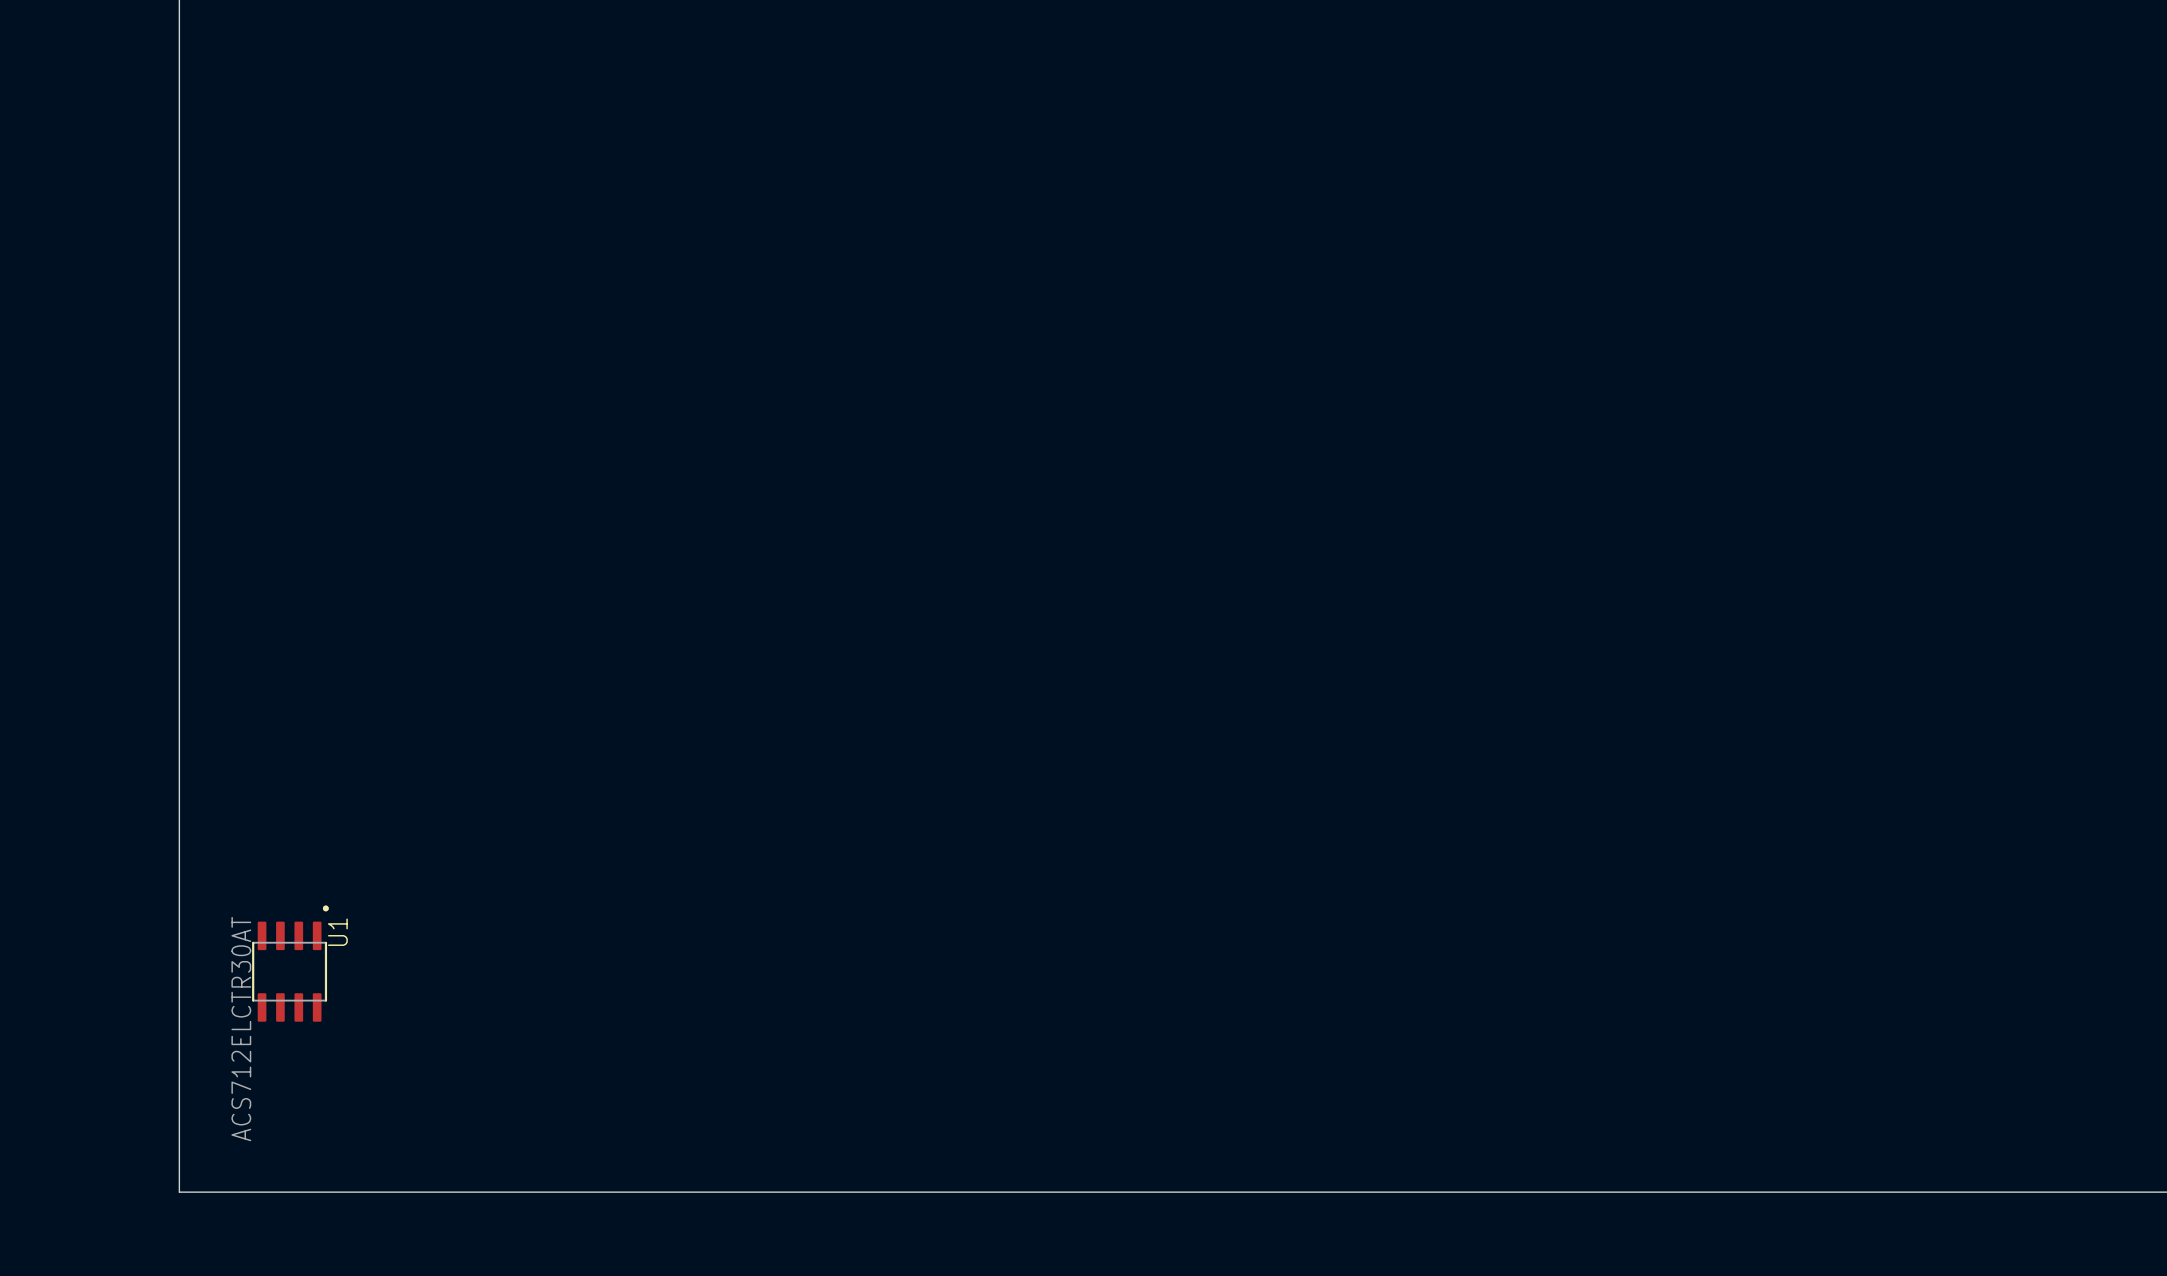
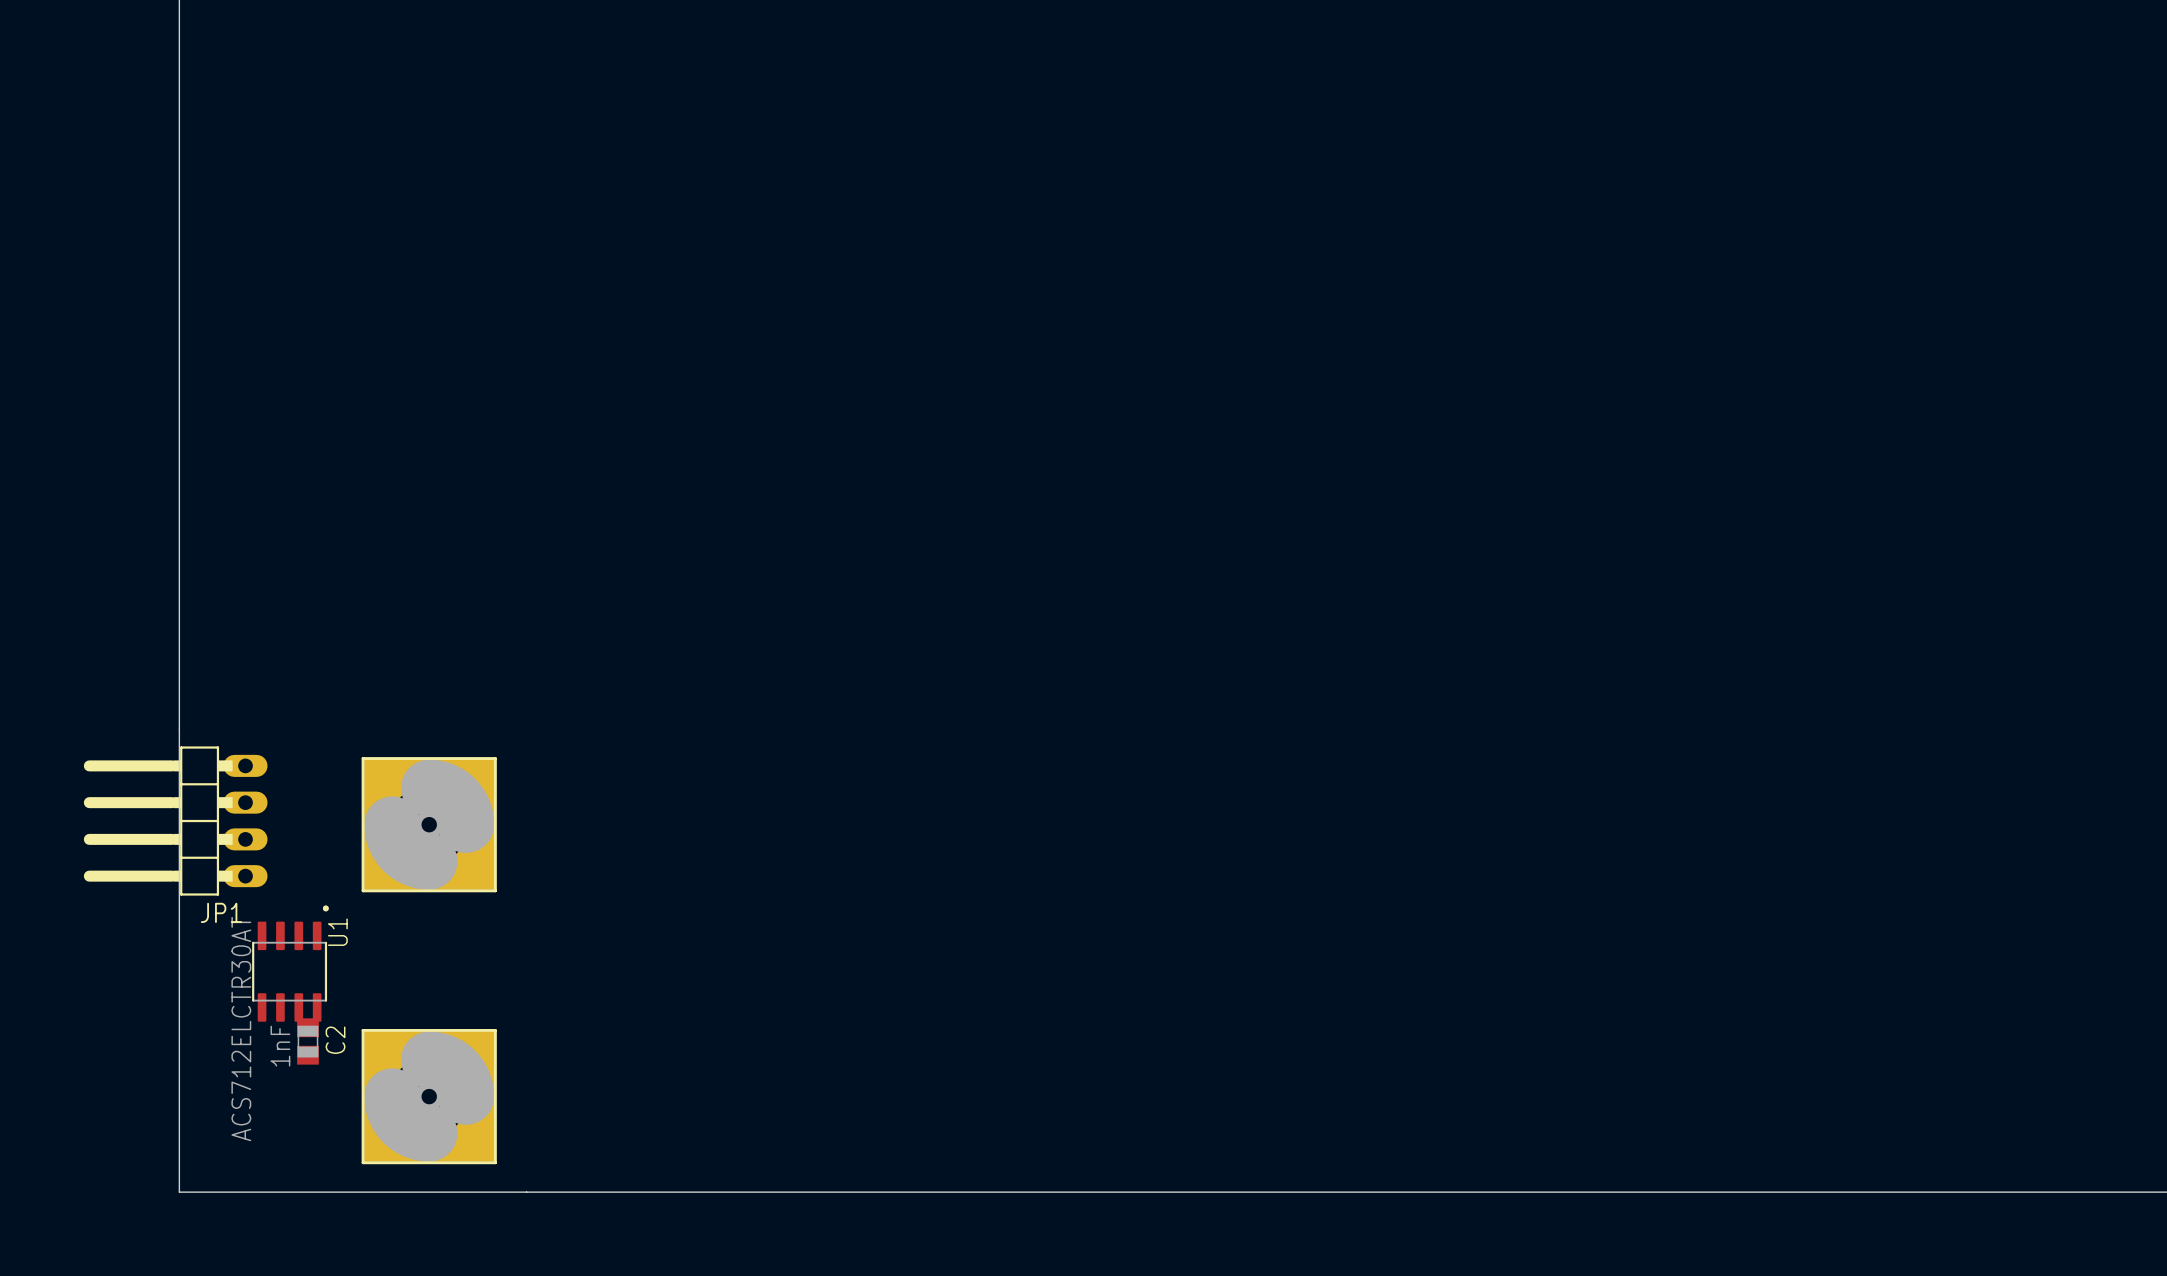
JP1: none -> (175, 821)
part: none -> (429, 824)
C2: none -> 1nF (307, 1041)
part: none -> (429, 1096)

